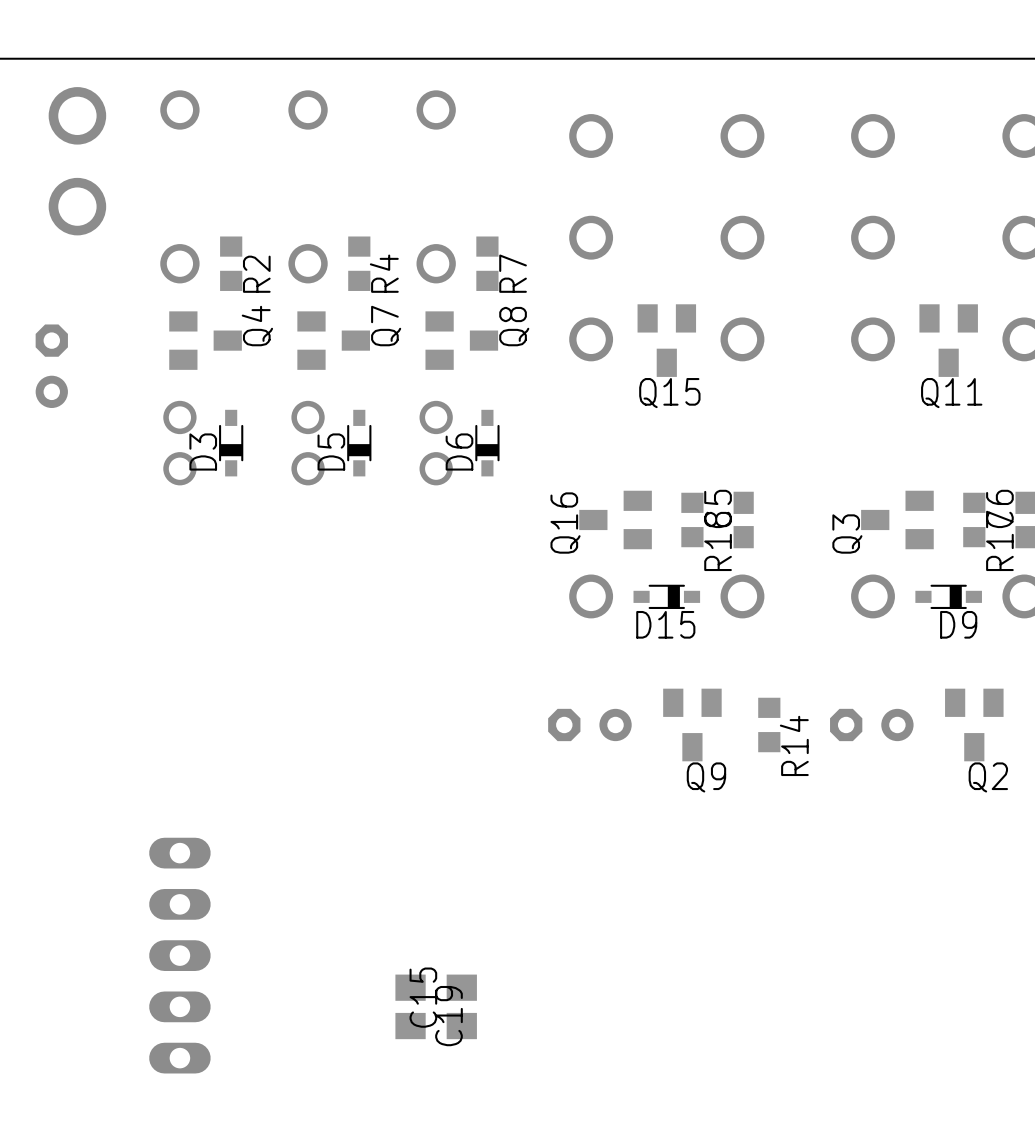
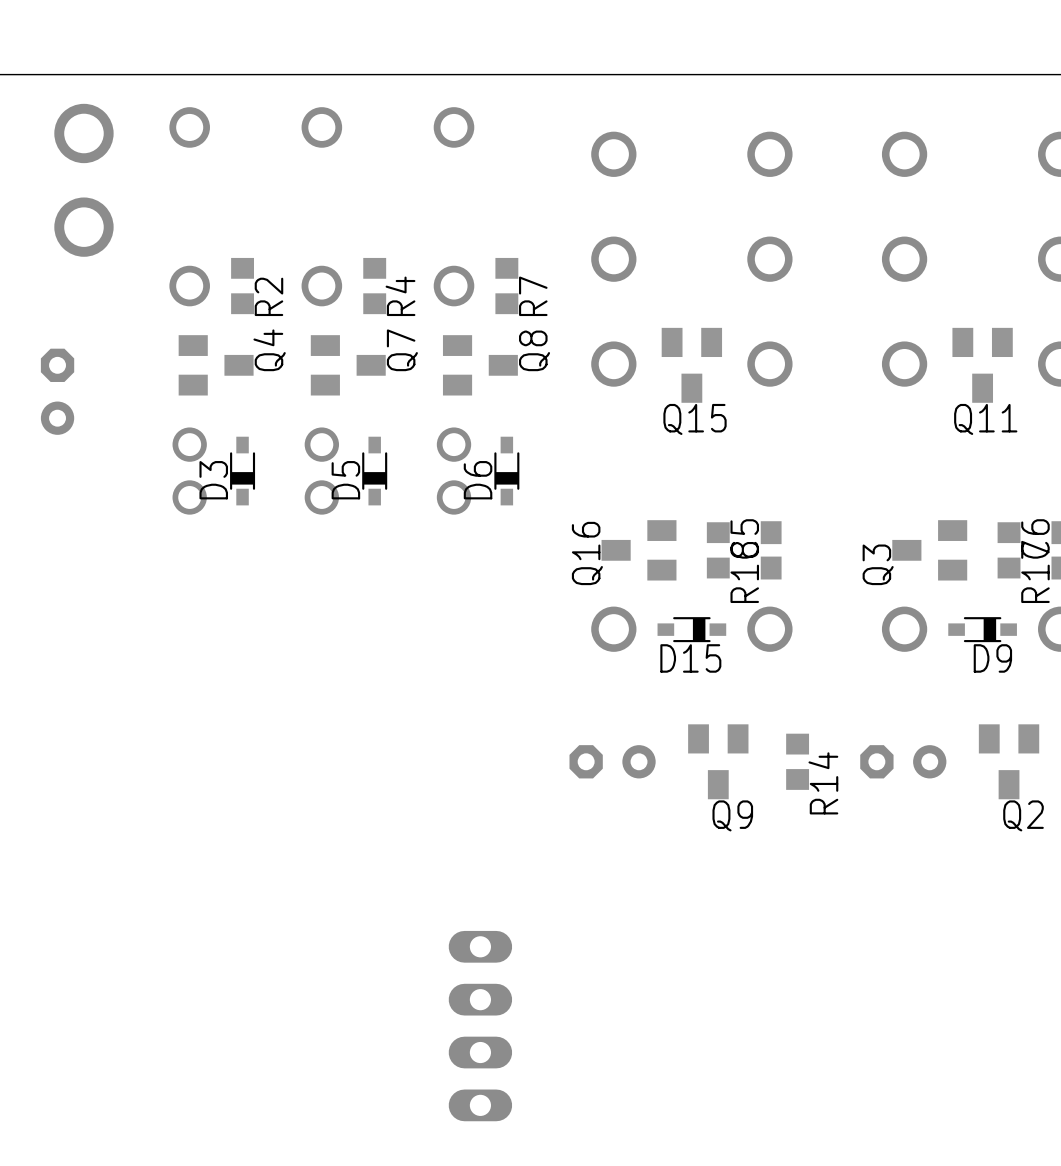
part: (179, 955) -> none
part: none -> (480, 1026)
C19: (410, 1006) -> none
C15: (461, 1006) -> none

